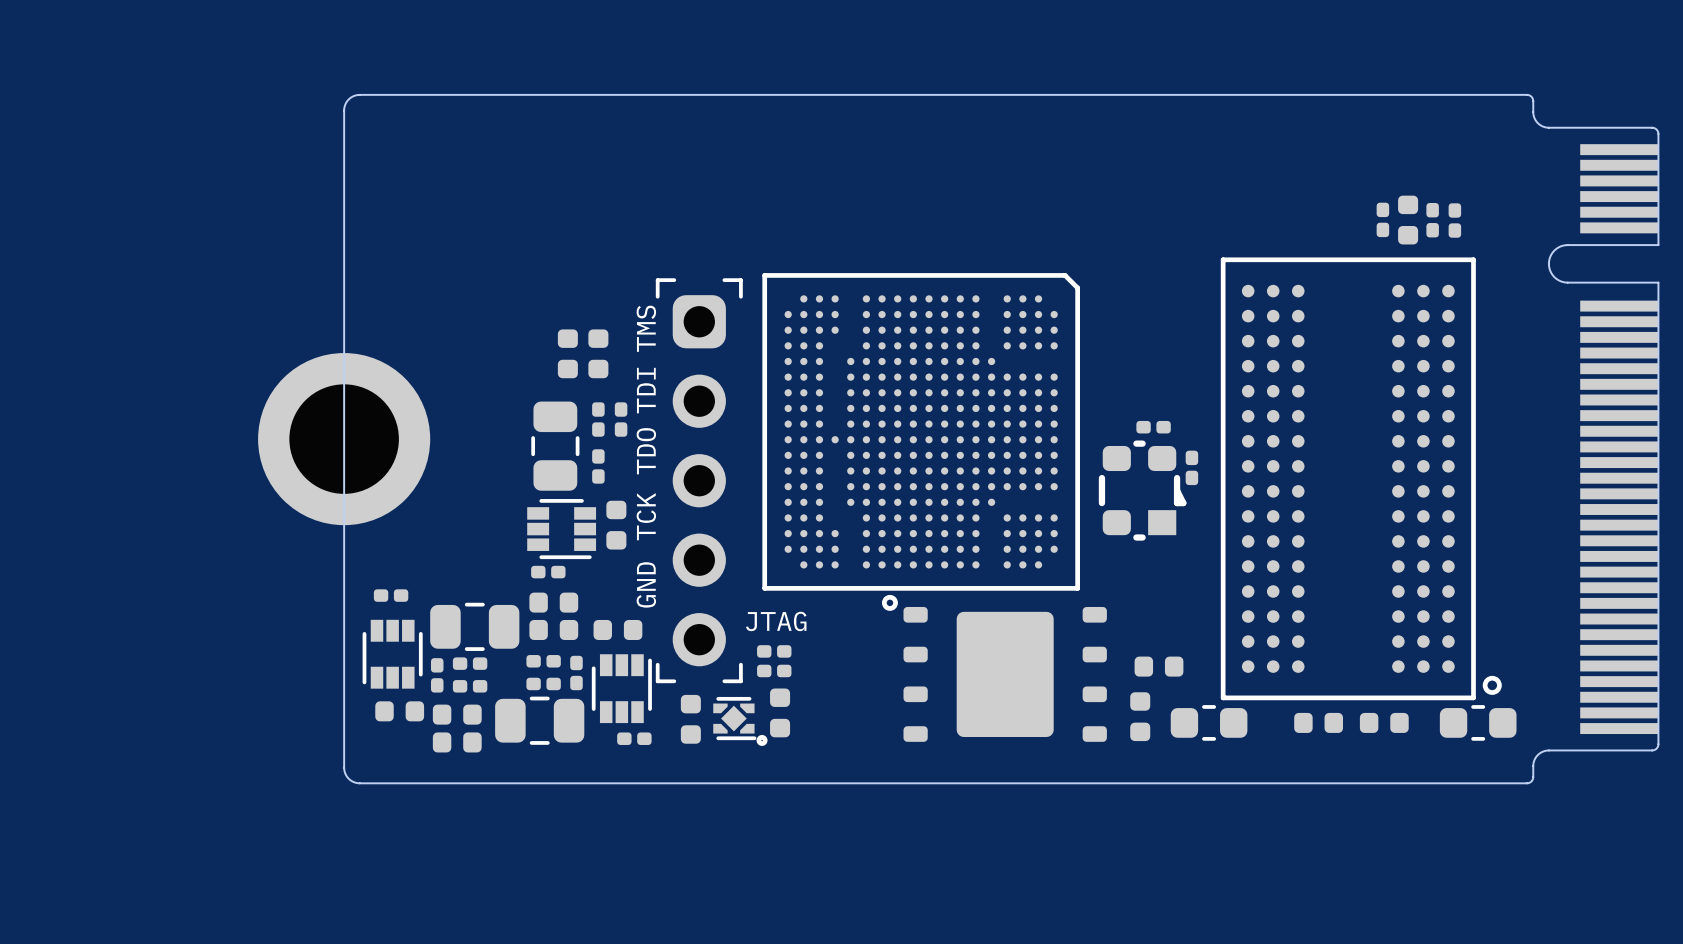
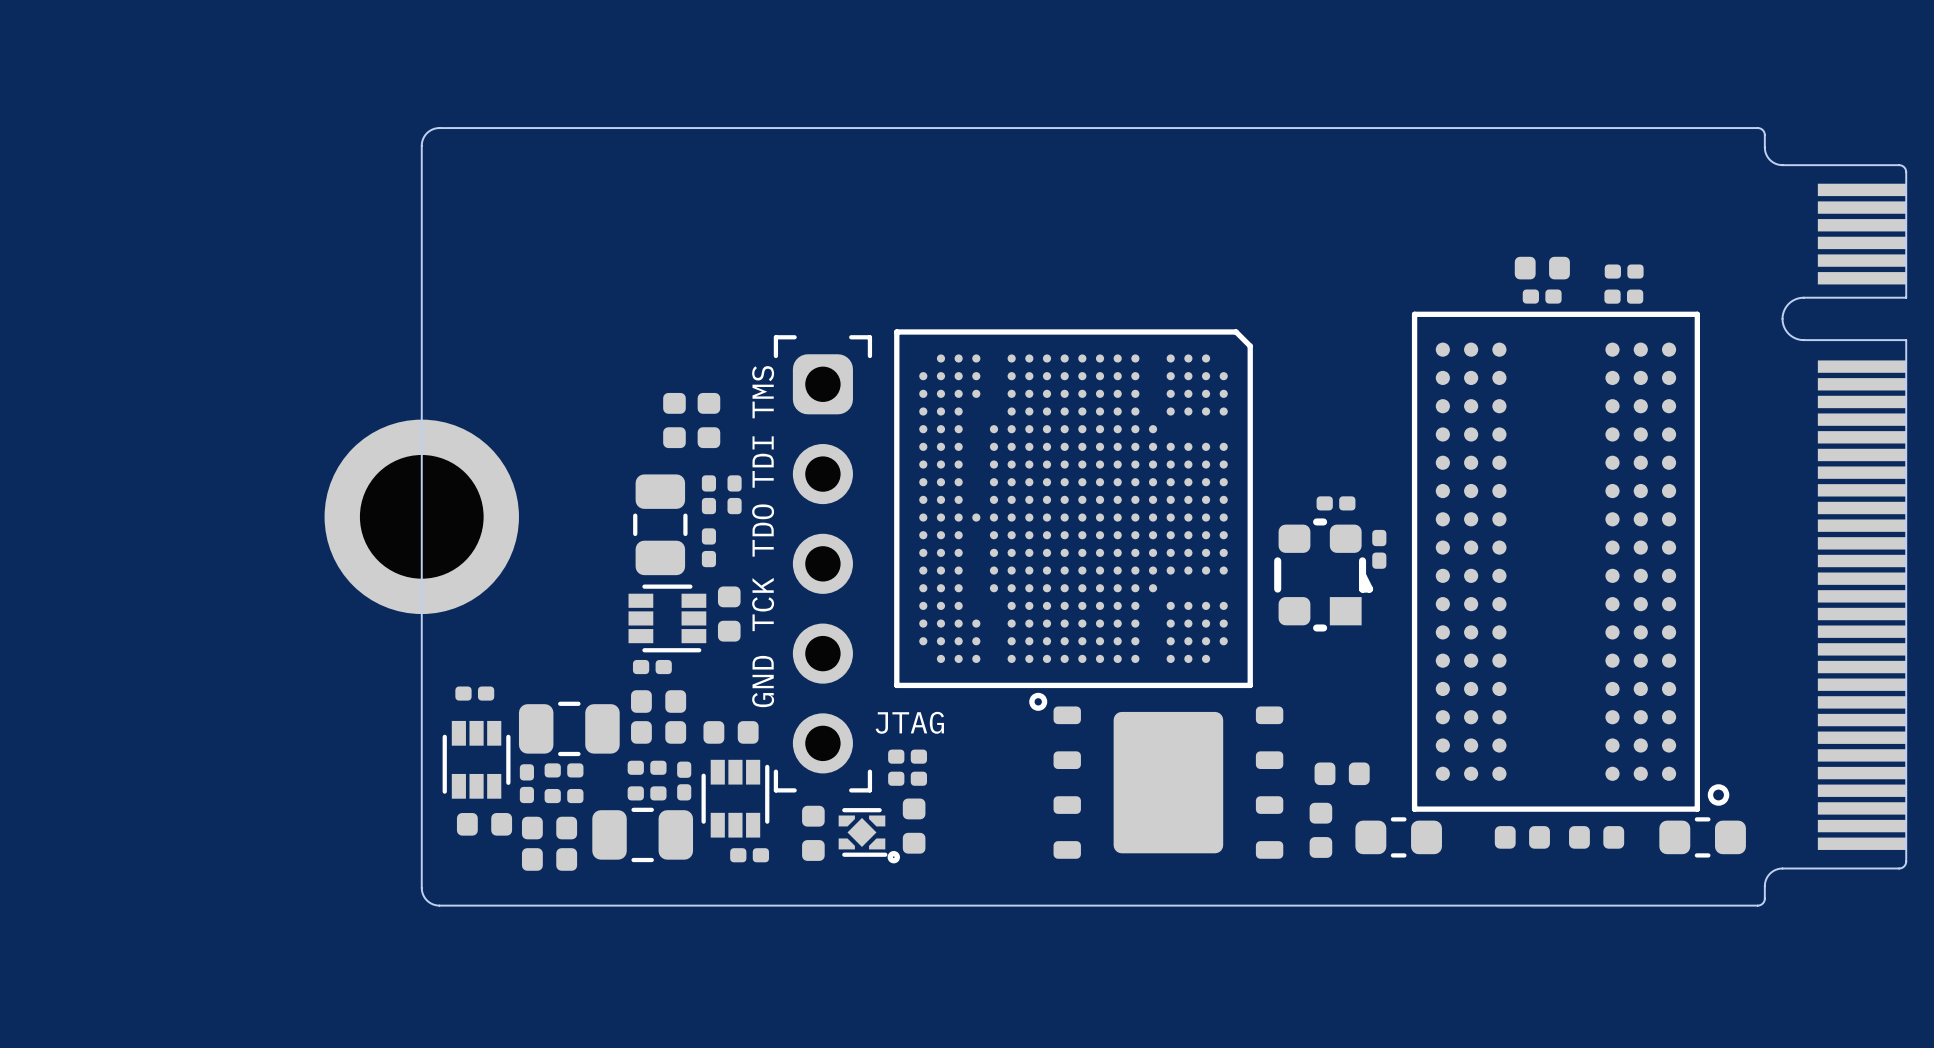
part footprint: [1398, 195, 1419, 245] -> [1604, 264, 1644, 279]
part: none -> (1542, 268)
part: (1382, 219) -> none
part: (1432, 220) -> none
part: (1454, 220) -> none
part: none -> (1542, 296)
part: none -> (1623, 296)

